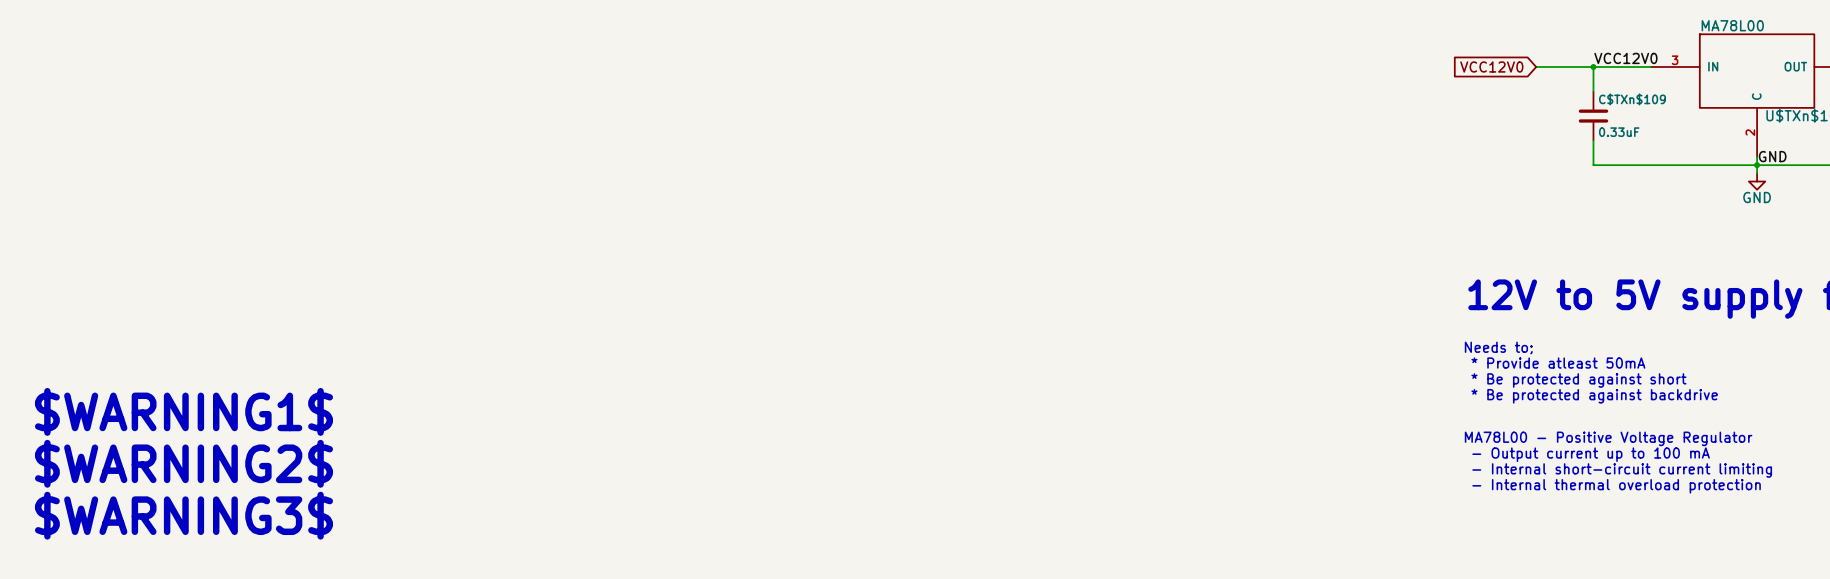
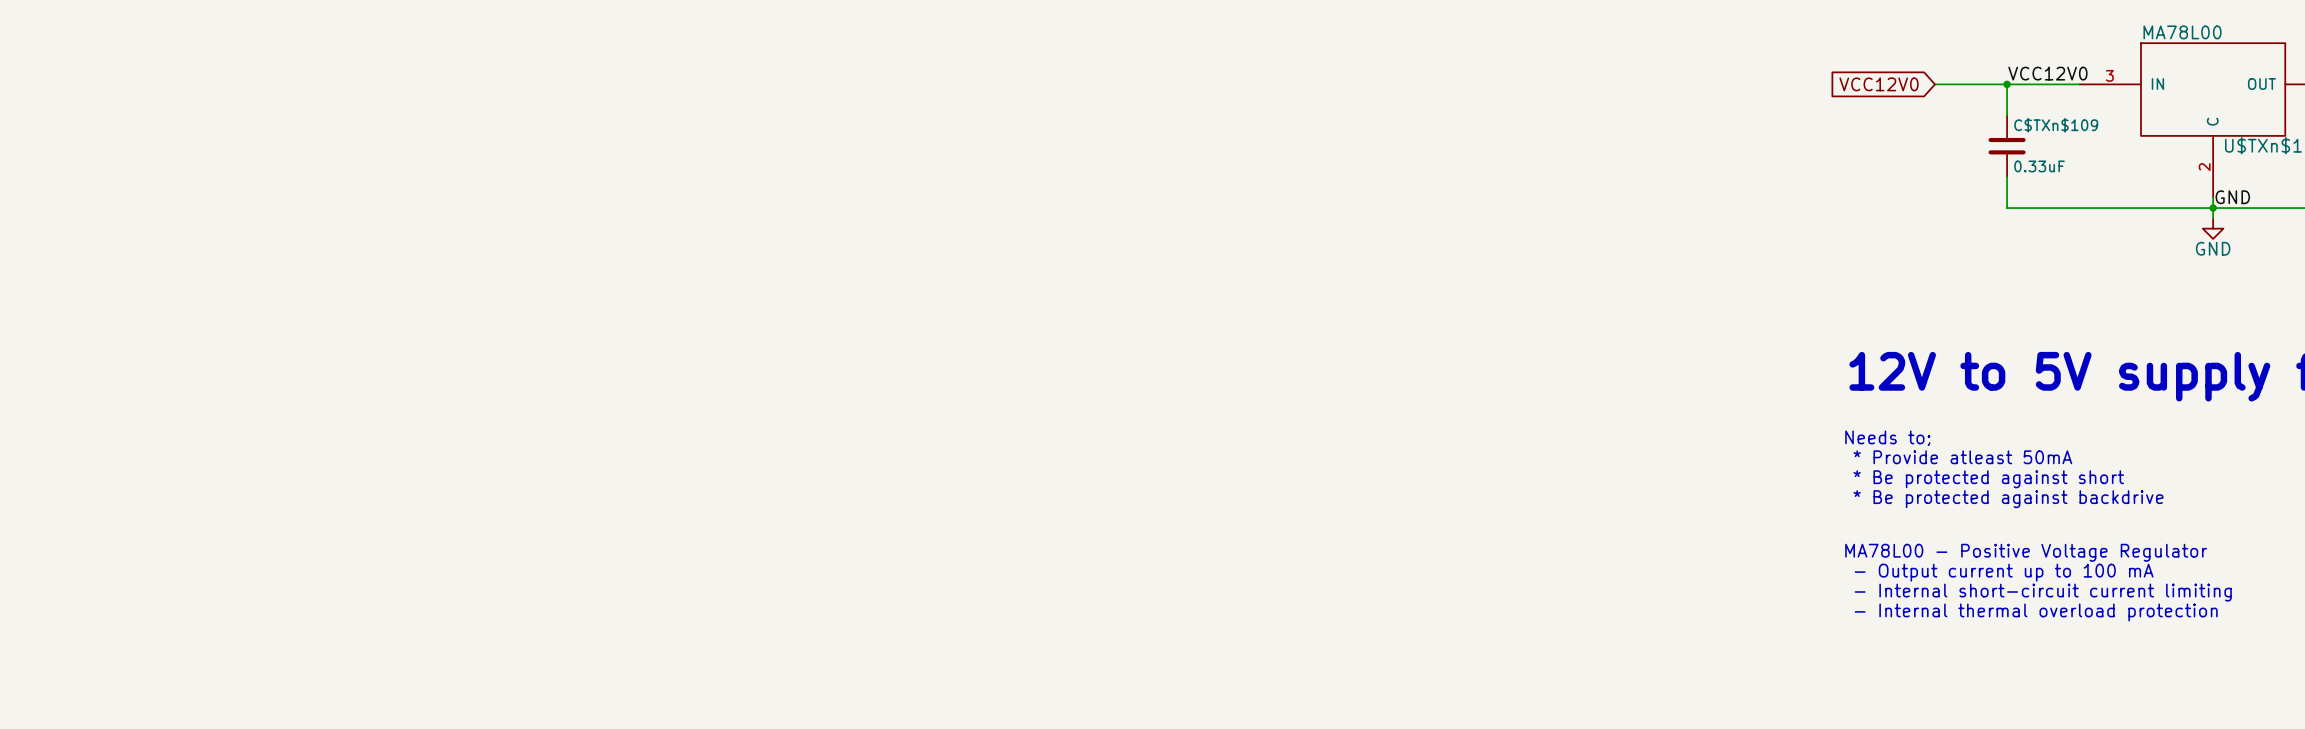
text: $WARNING1$ (183, 411) -> none
text: $WARNING2$ (183, 463) -> none
text: $WARNING3$ (183, 515) -> none

